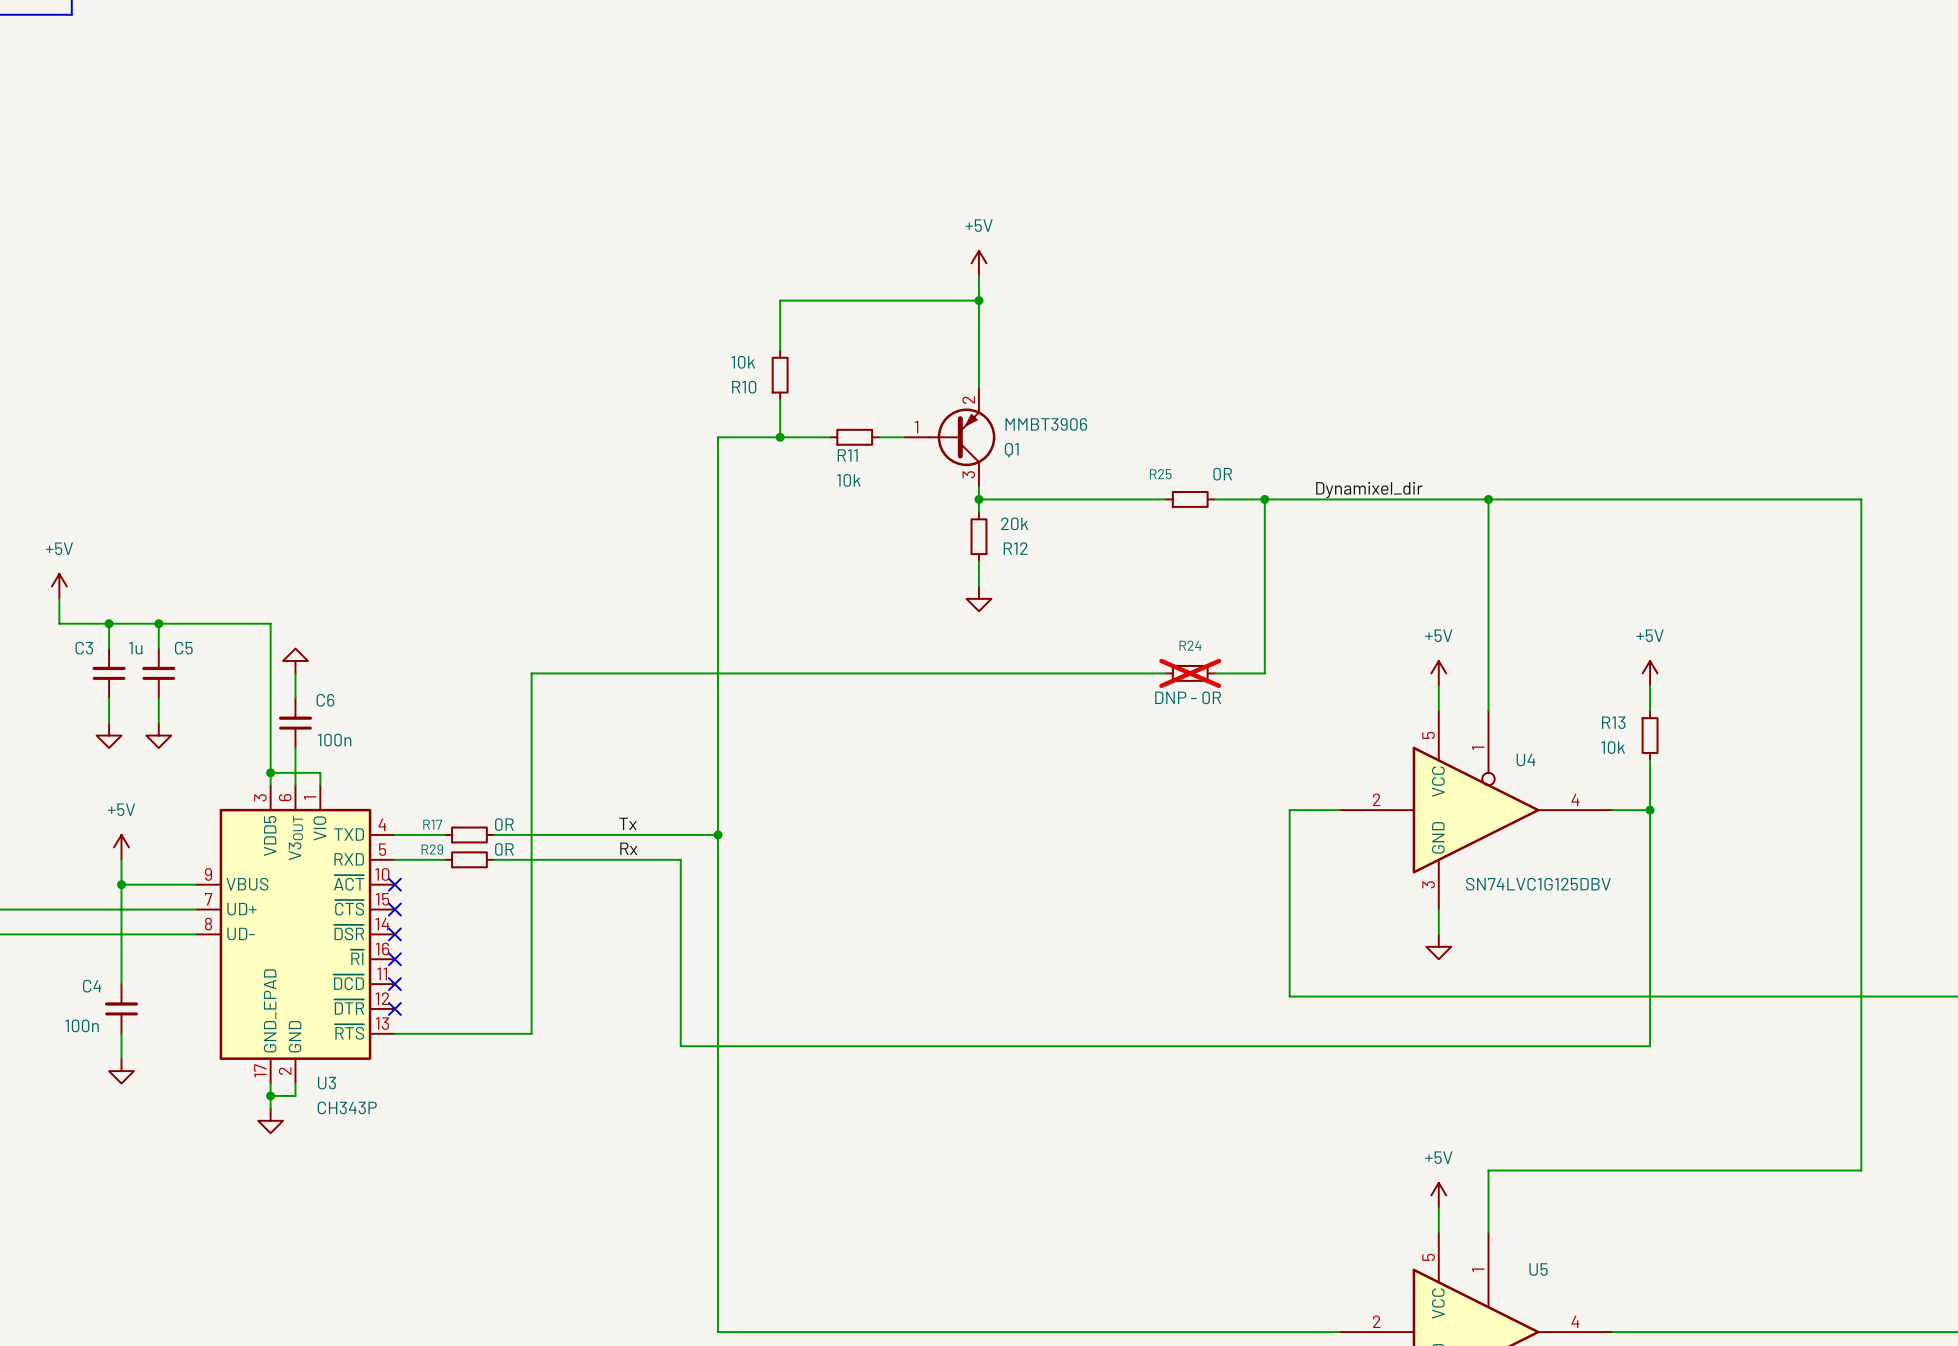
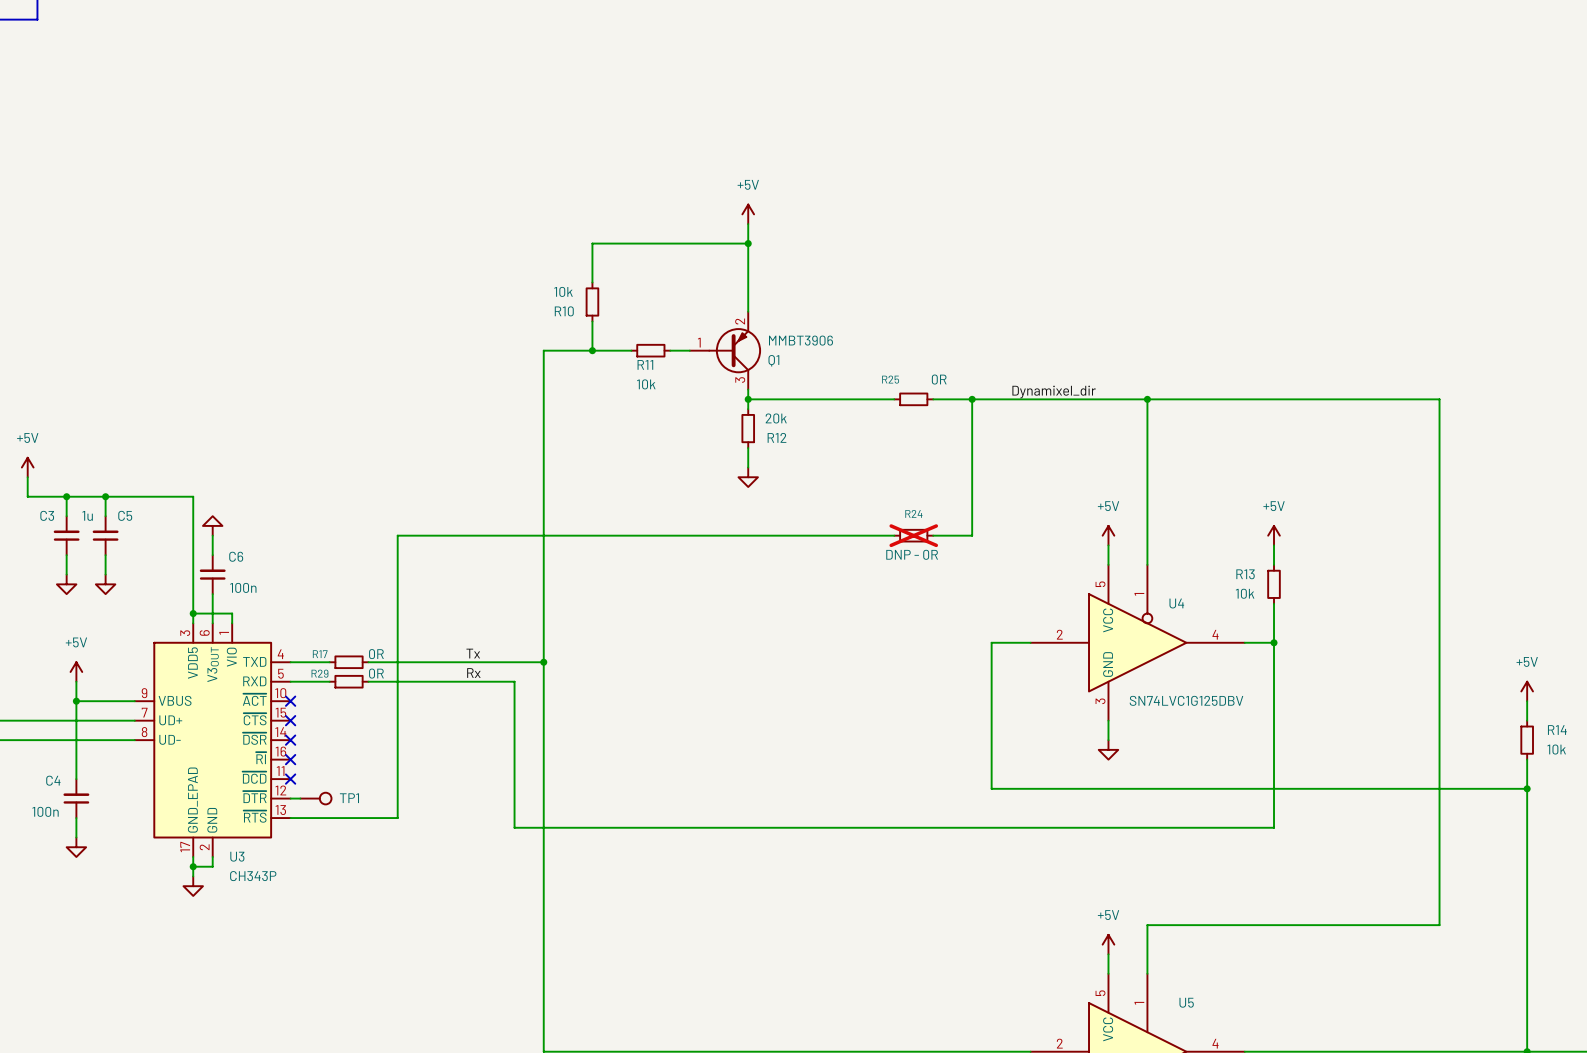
wire: none -> (290, 798) (300, 798)
no-connect mark: (394, 1008) -> none
TP1: none -> (315, 798)

